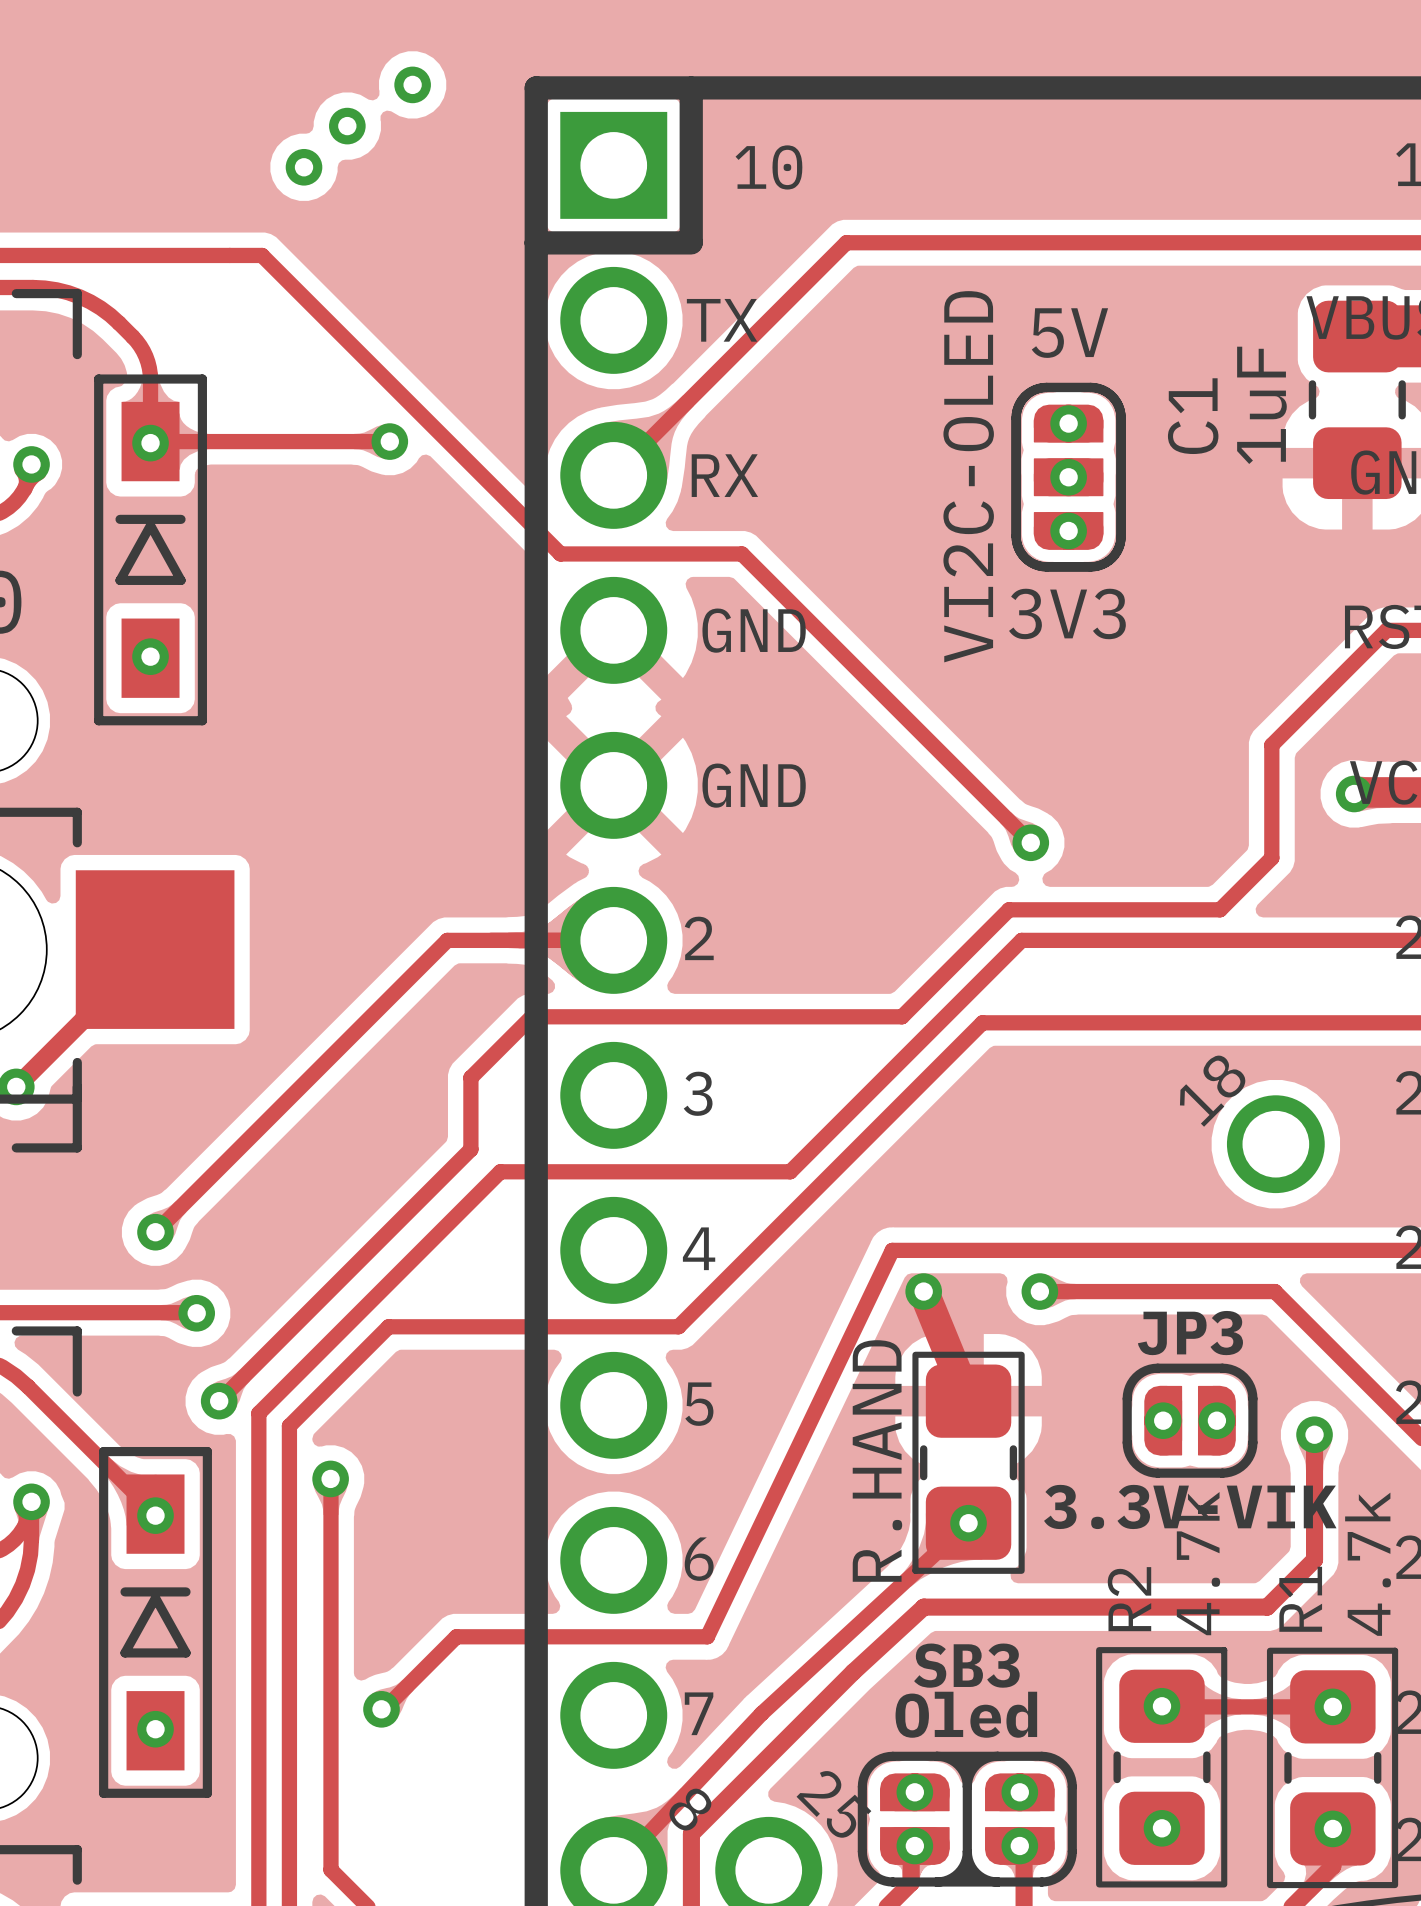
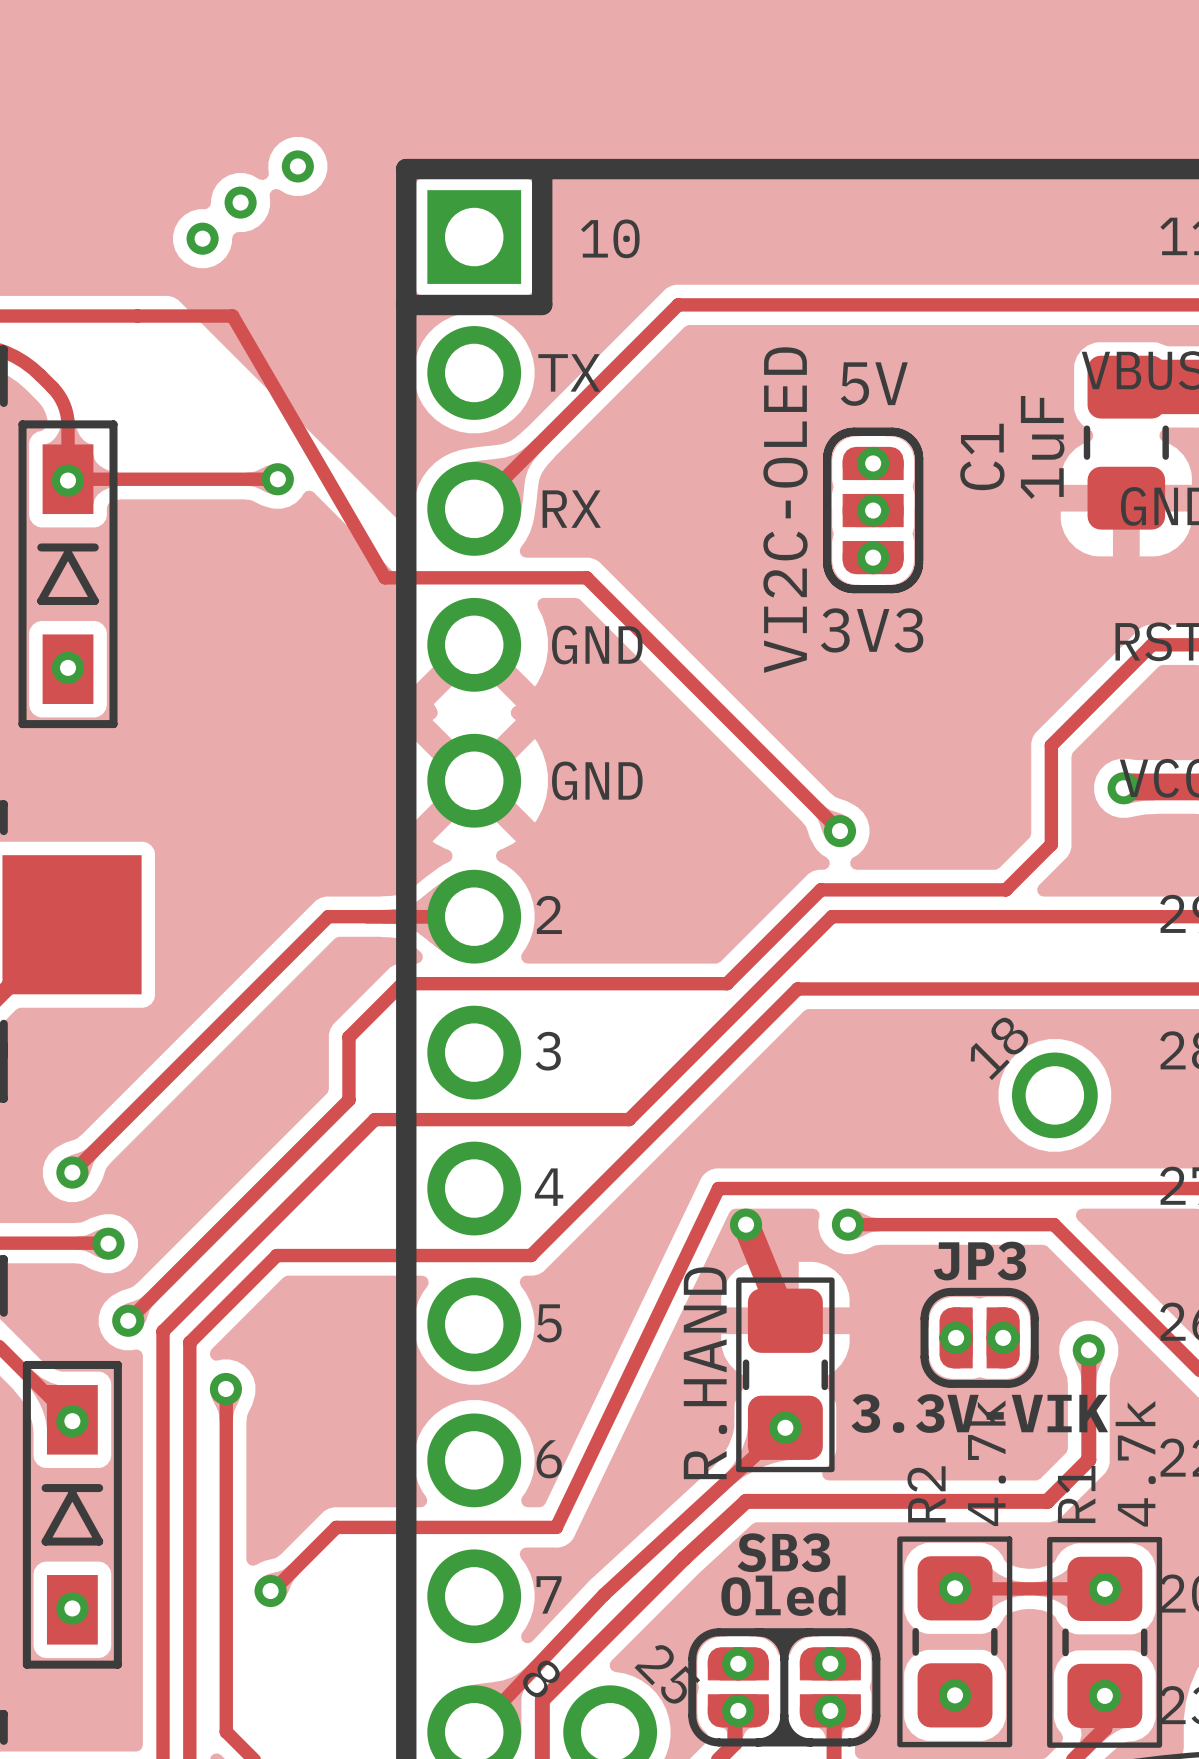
track: (262, 255) (560, 553) -> (165, 316) (232, 316) (385, 577) (427, 577)

